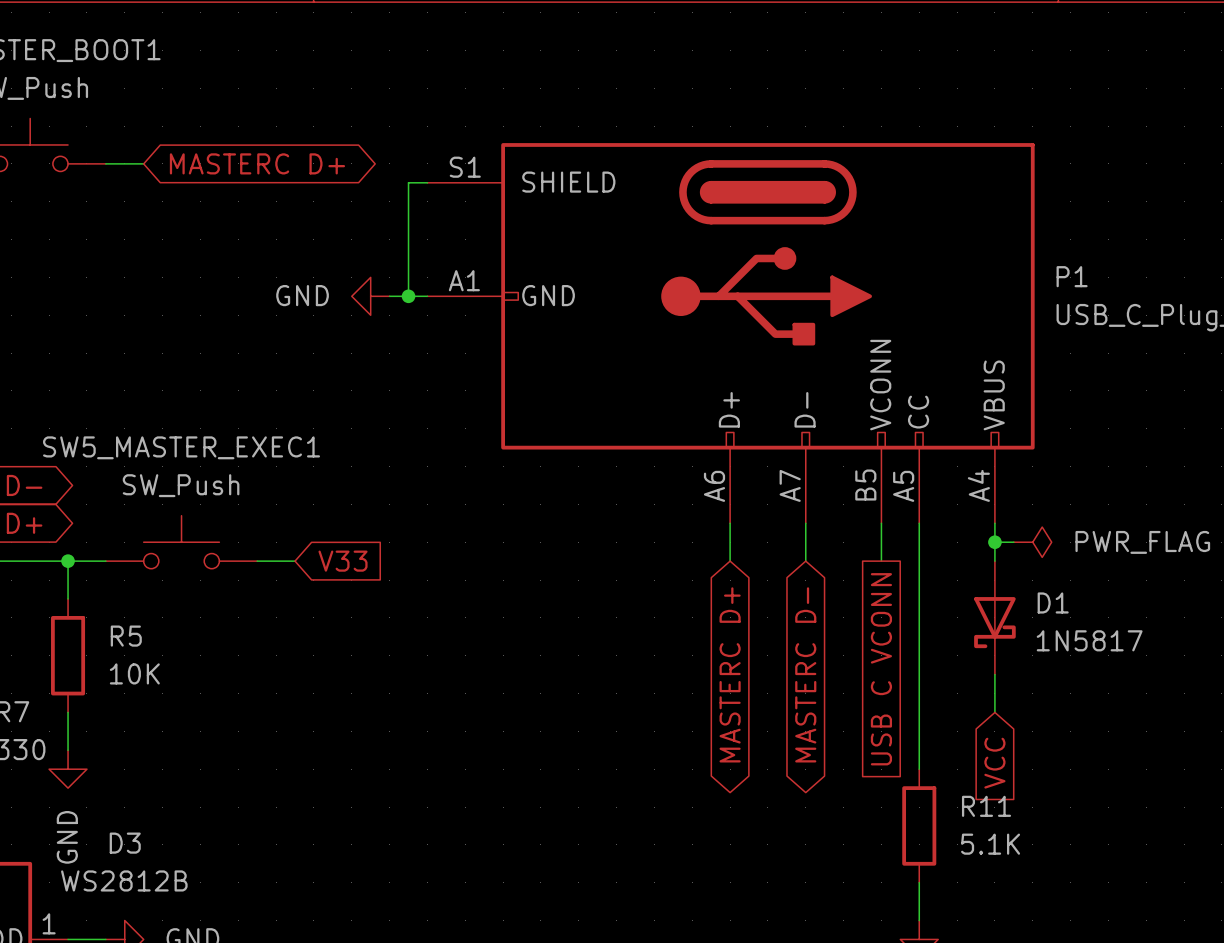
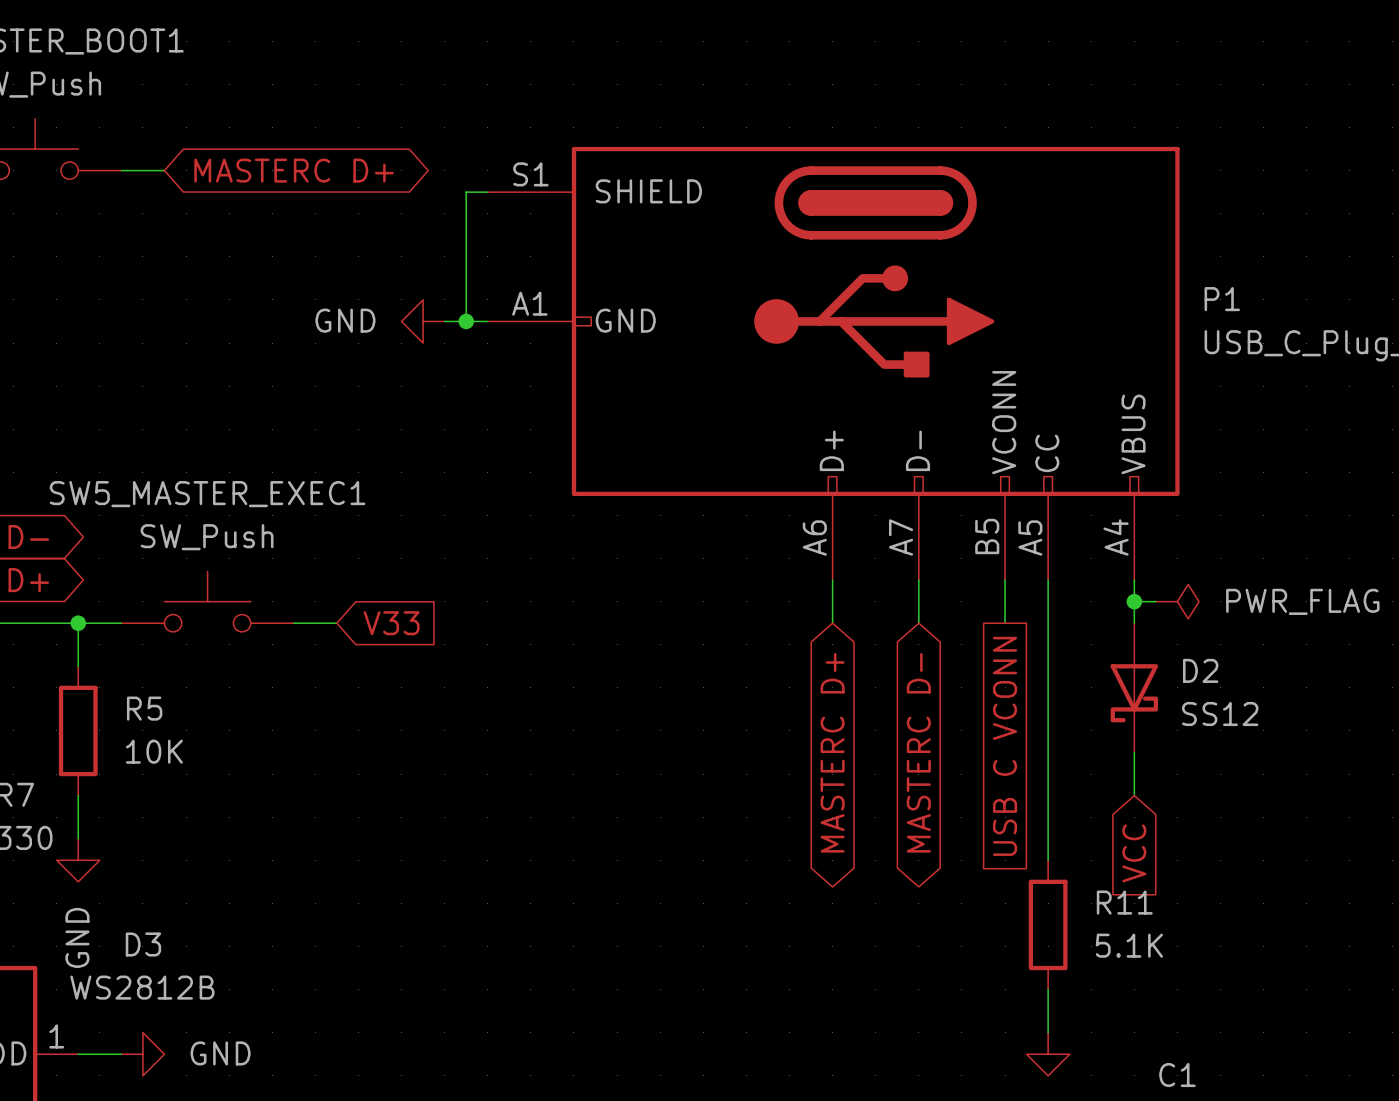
D1 name: D1 (1053, 602) -> D2 (1200, 670)
D1 value: 1N5817 (1089, 640) -> SS12 (1220, 713)

